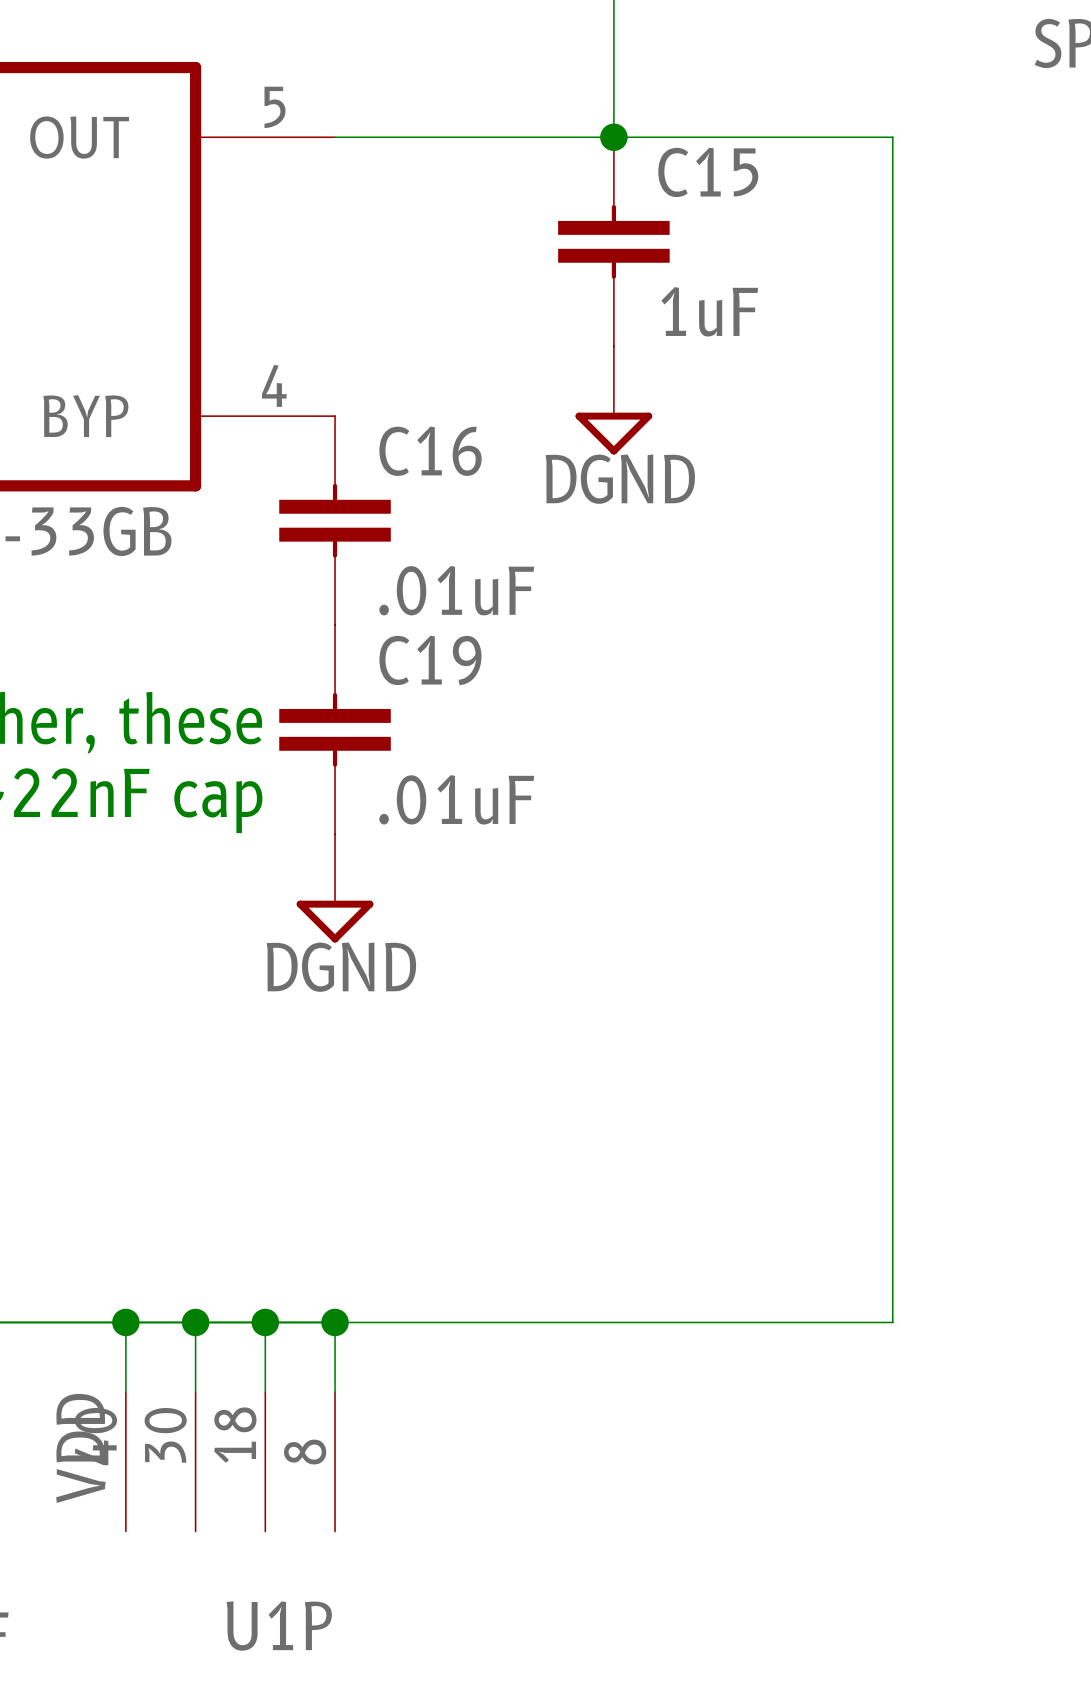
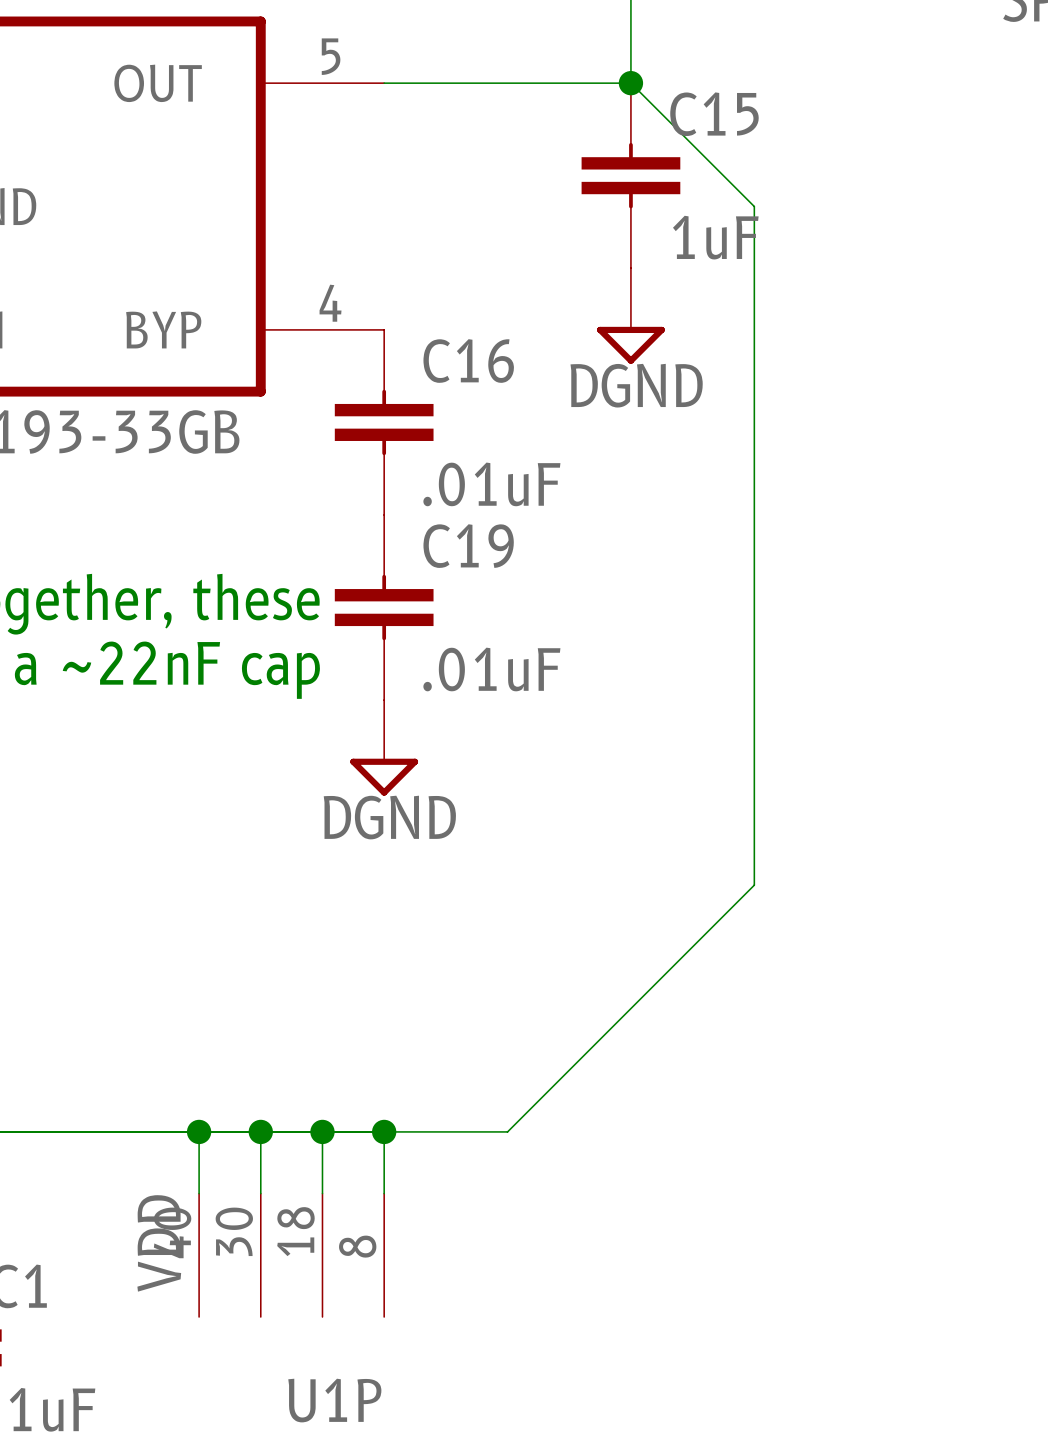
wire: (613, 137) (892, 137) (892, 1322) (474, 1322) -> (630, 83) (754, 206) (754, 885) (507, 1131)

